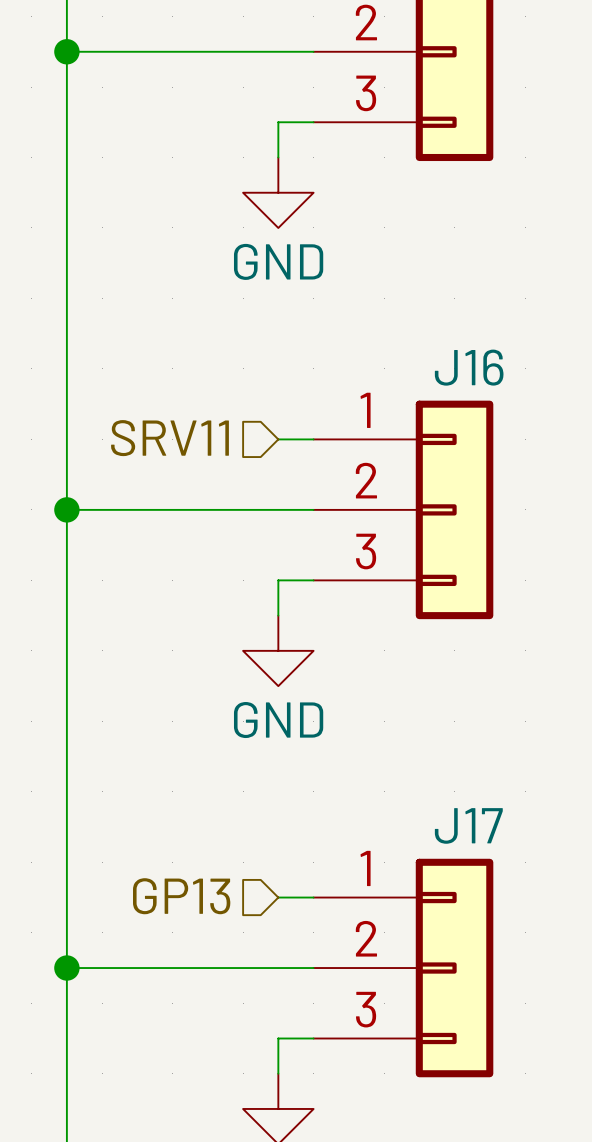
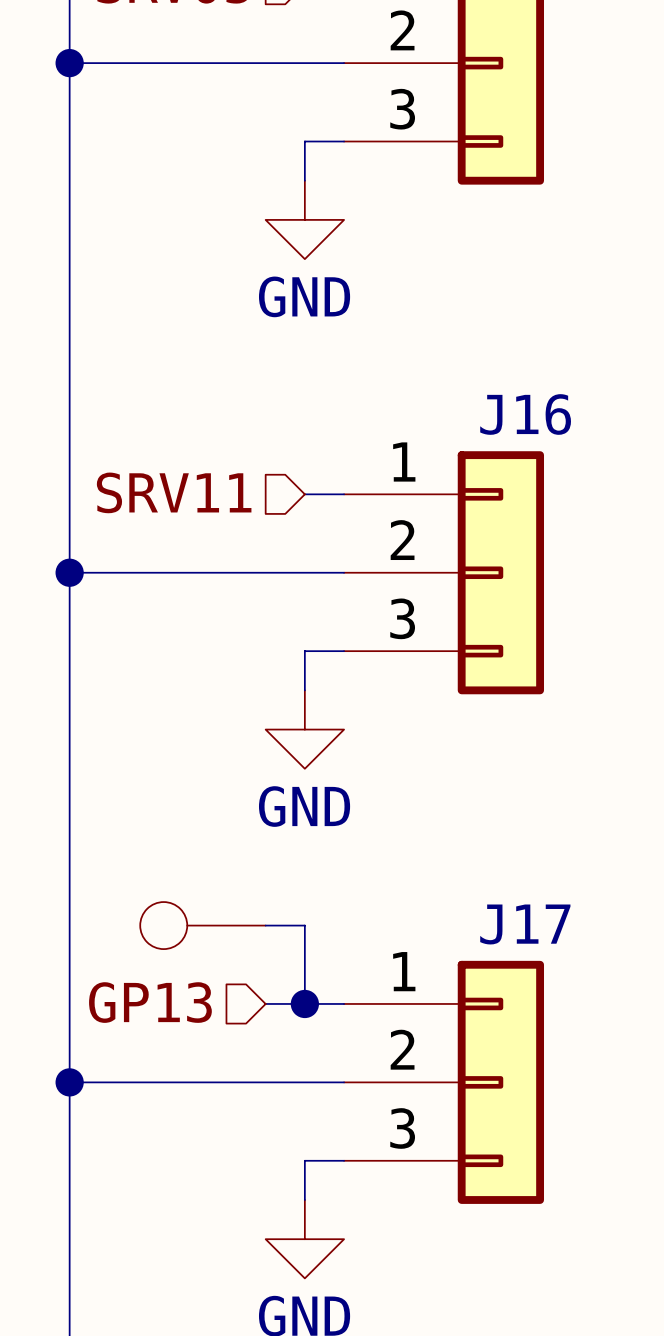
part: none -> (202, 925)
wire: none -> (265, 925) (304, 925) (304, 1003) (265, 1003)
hierarchical label position: GP13 (181, 896) -> GP13 (150, 1002)
junction: none -> (304, 1003)

